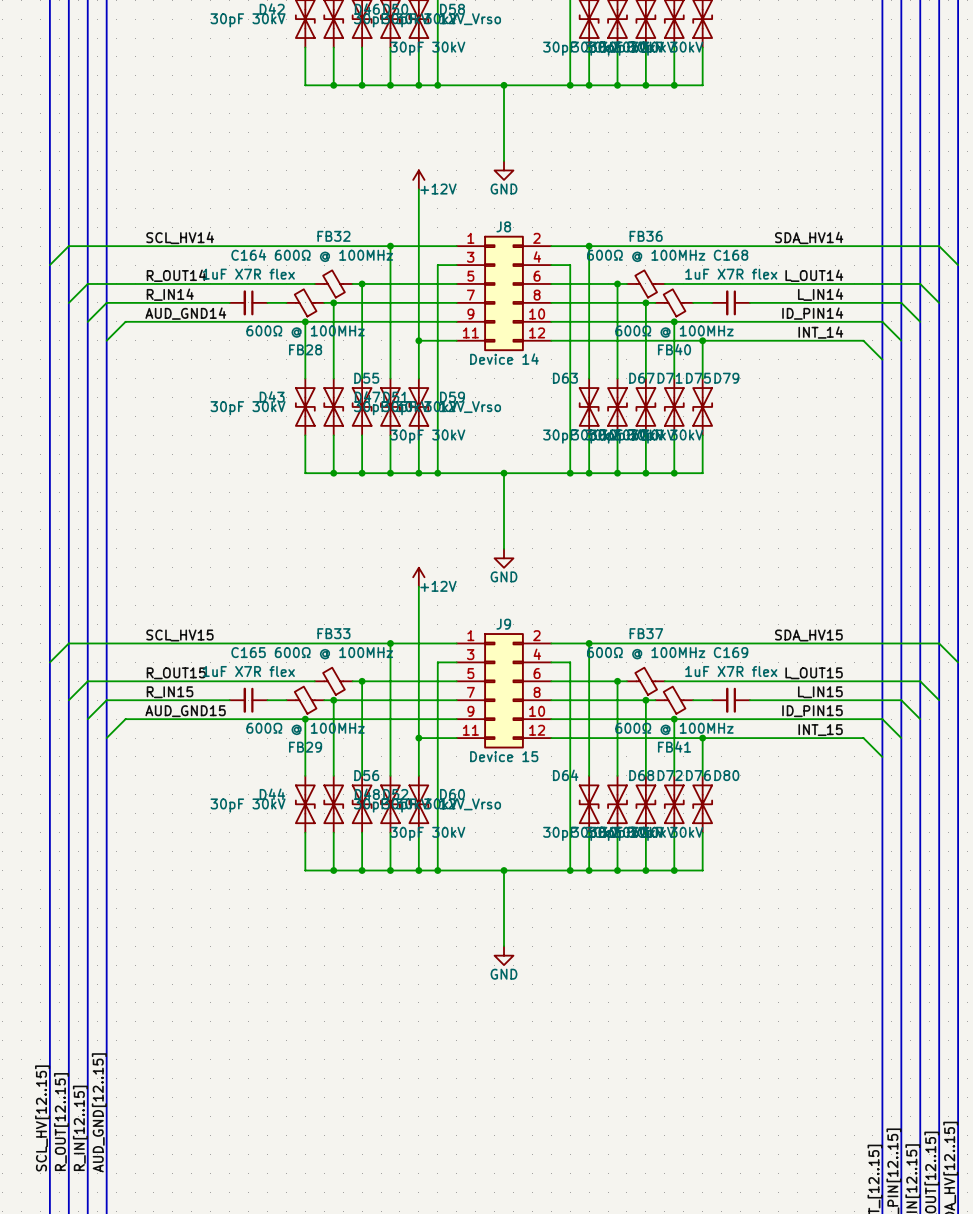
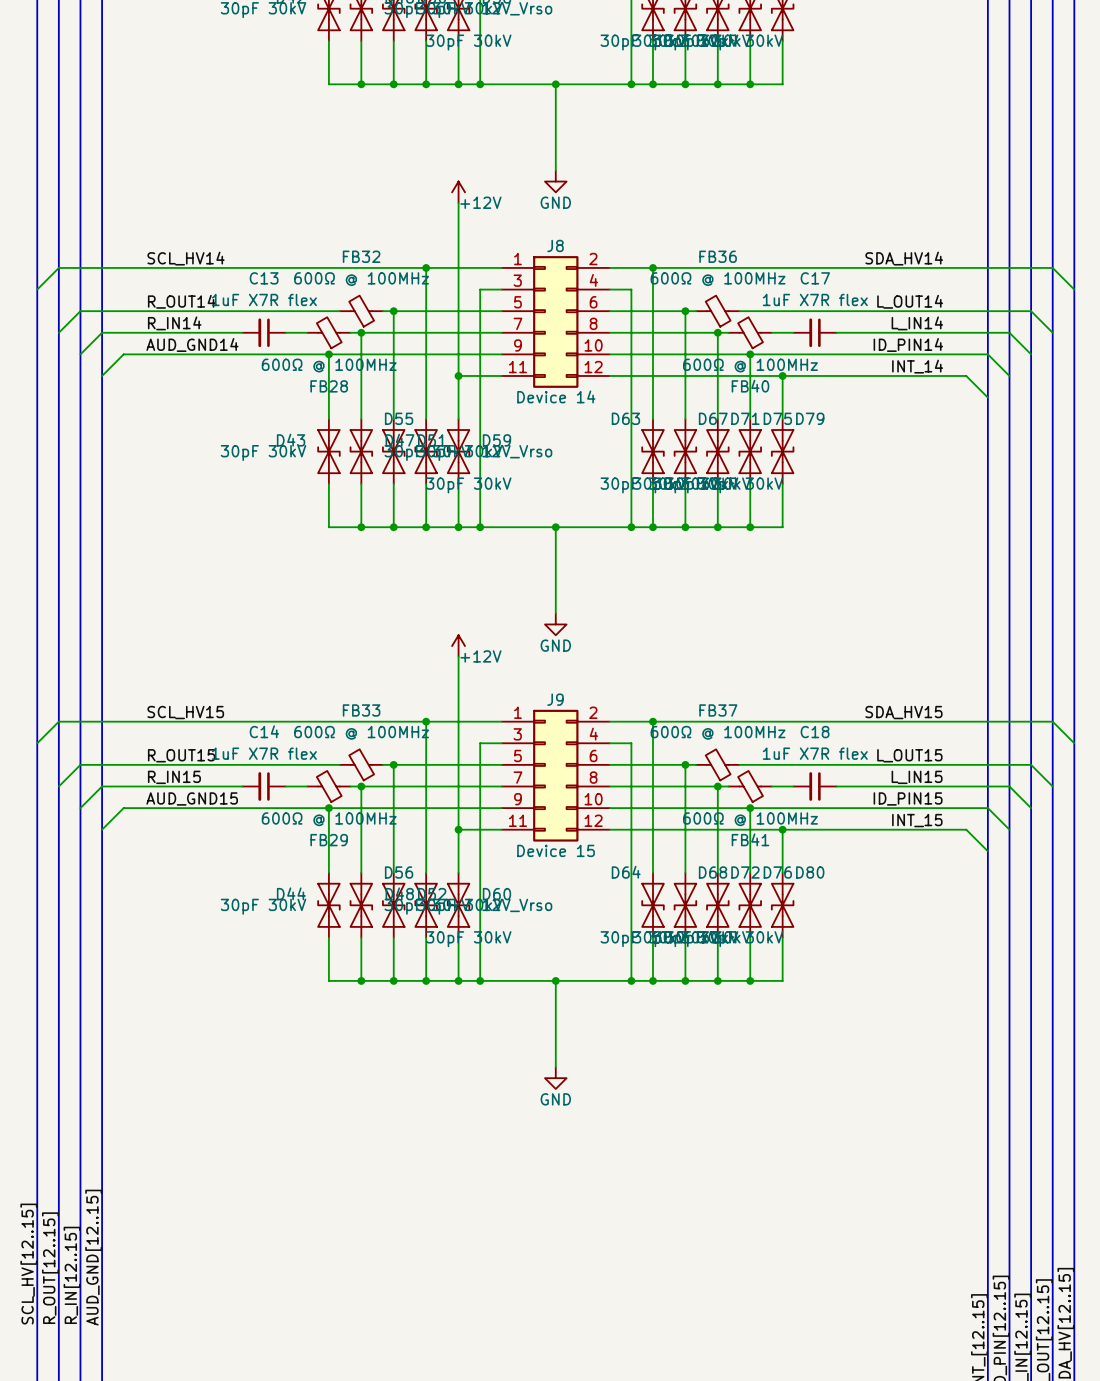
C164 name: C164 (248, 255) -> C13 (264, 278)
C168 name: C168 (731, 255) -> C17 (815, 278)
C165 name: C165 (248, 652) -> C14 (264, 731)
C169 name: C169 (731, 652) -> C18 (815, 732)

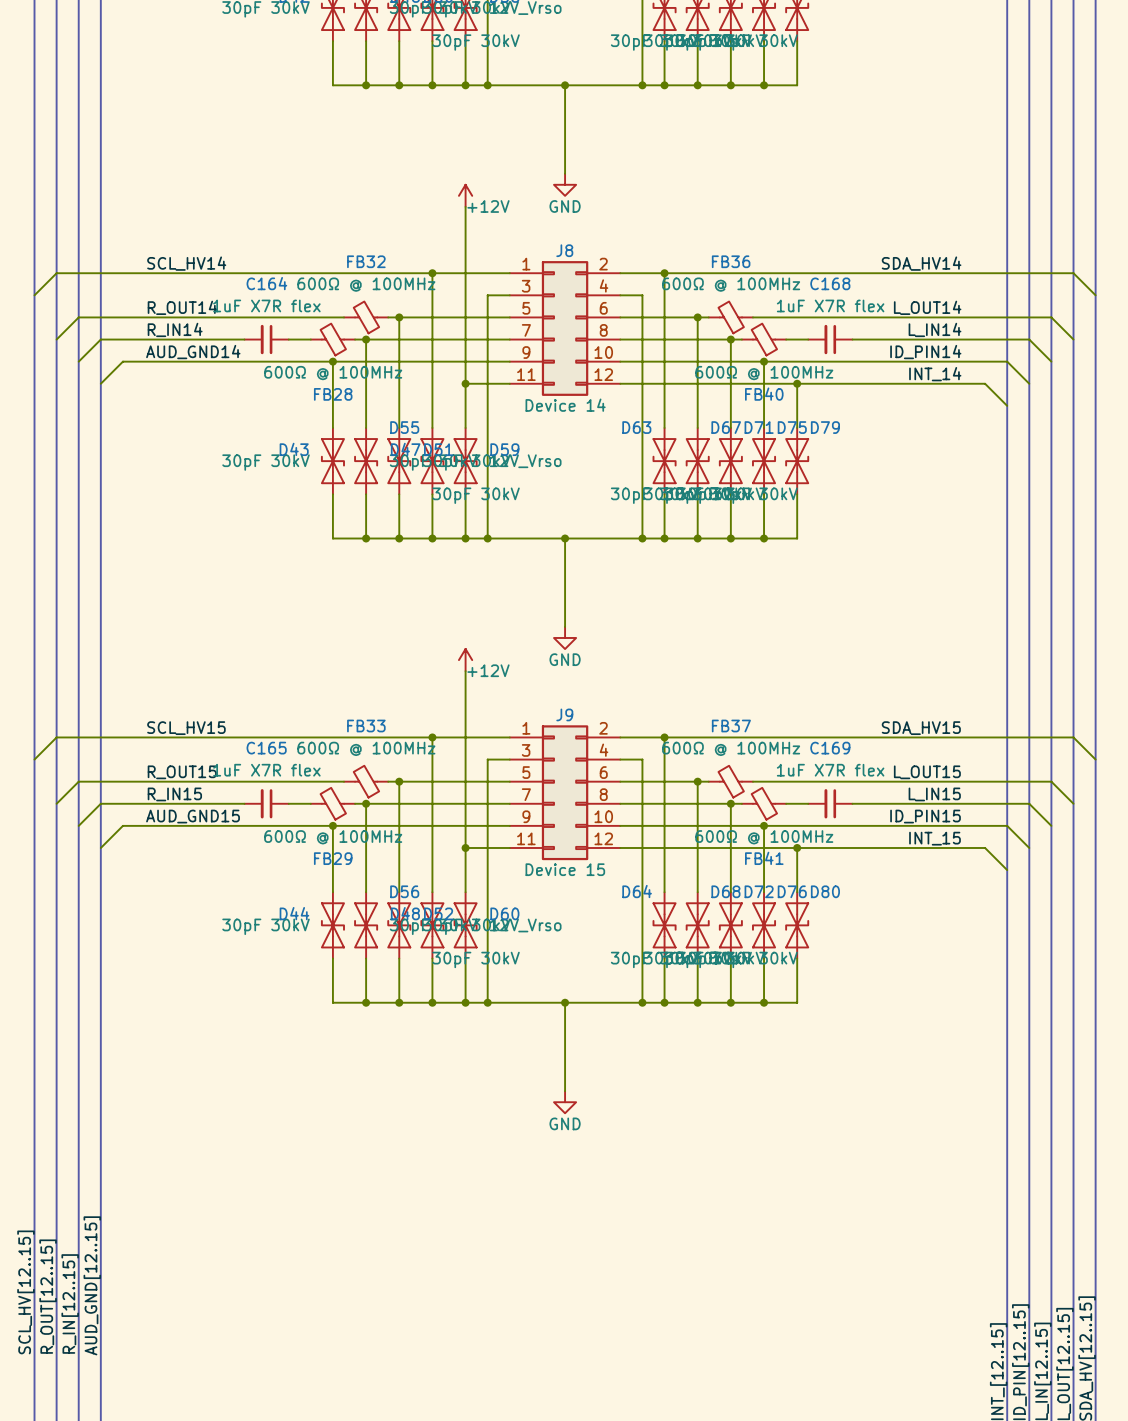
C13 name: C13 (264, 278) -> C164 (266, 283)
C17 name: C17 (815, 278) -> C168 (830, 283)
C14 name: C14 (264, 731) -> C165 (266, 748)
C18 name: C18 (815, 732) -> C169 (830, 748)

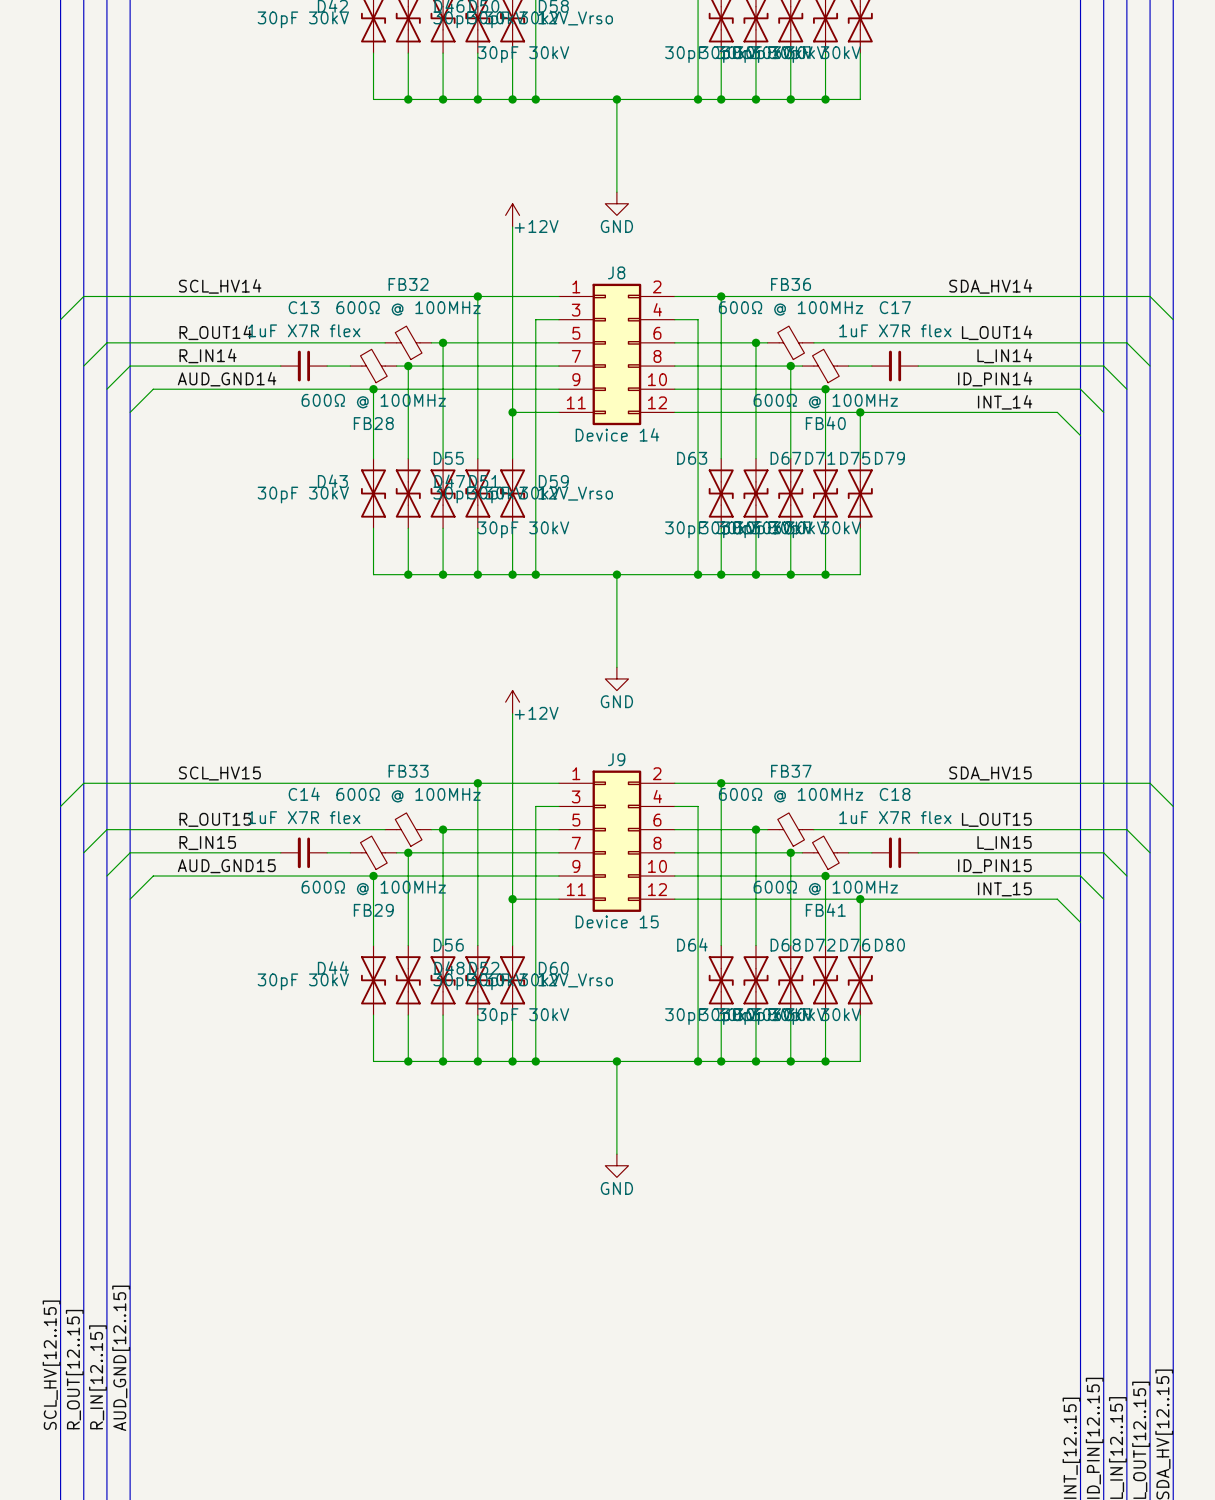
C164 name: C164 (266, 283) -> C13 (303, 307)
C168 name: C168 (830, 283) -> C17 (895, 307)
C165 name: C165 (266, 748) -> C14 (304, 794)
C169 name: C169 (830, 748) -> C18 (895, 794)

